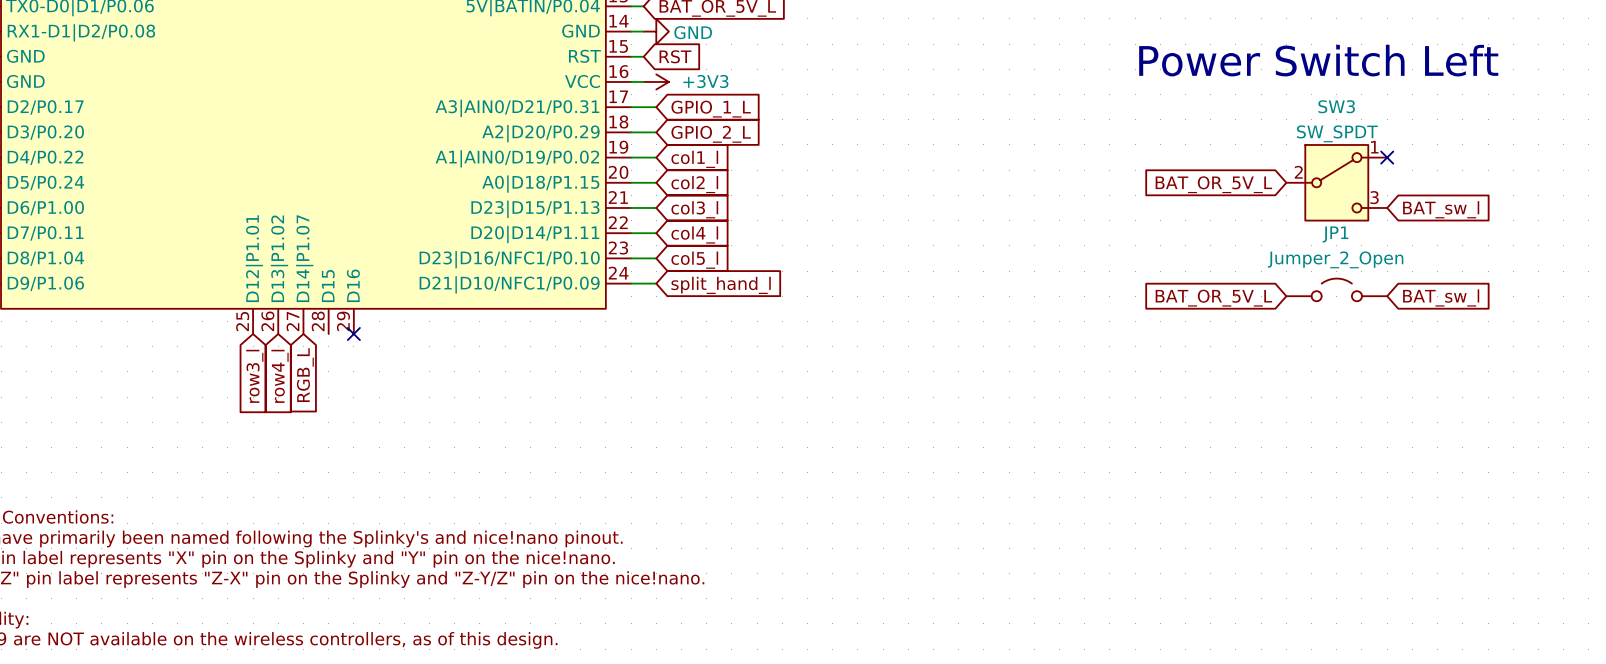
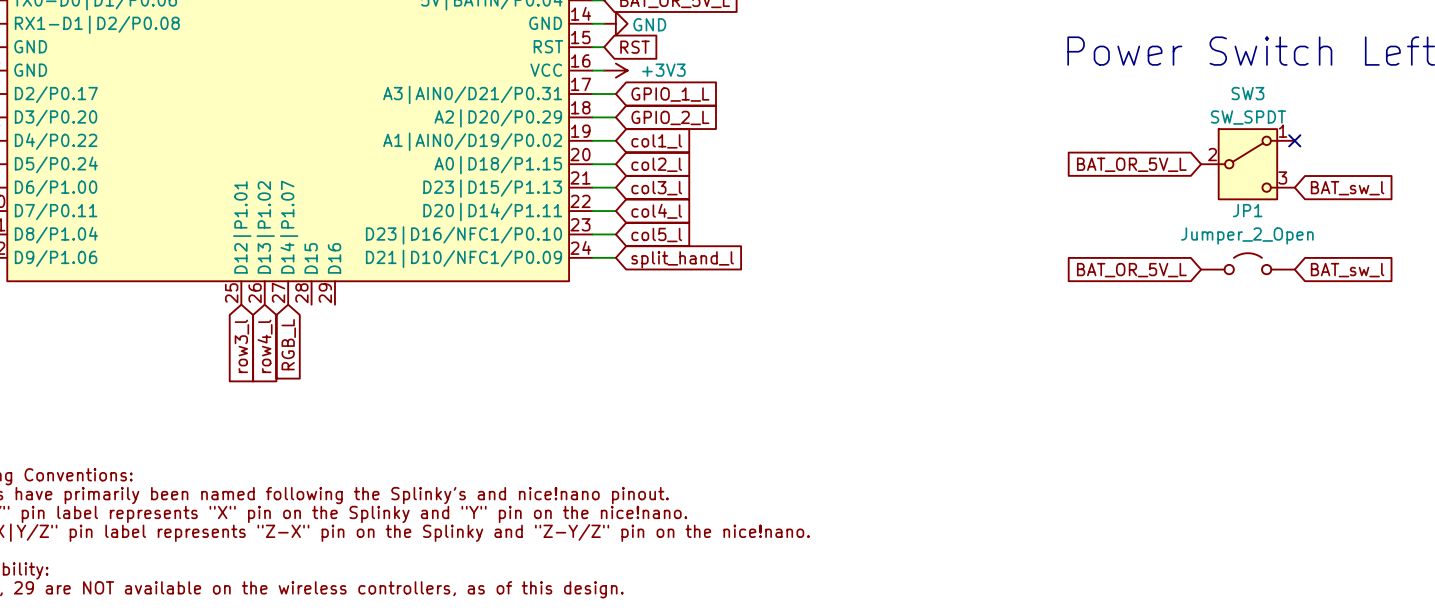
no-connect mark: (353, 334) -> none

